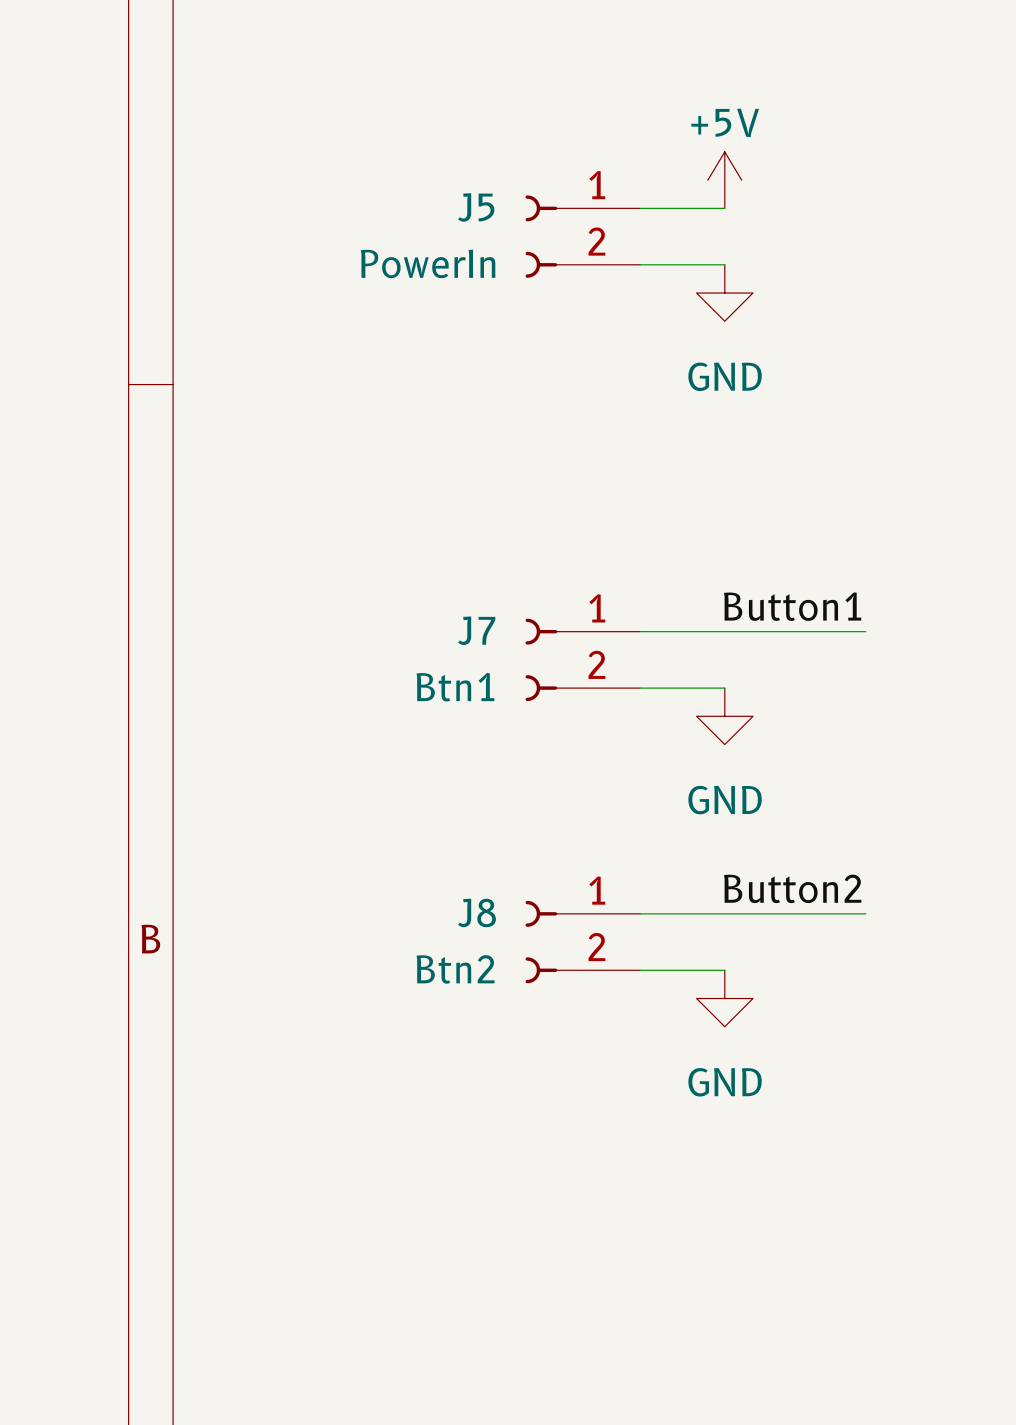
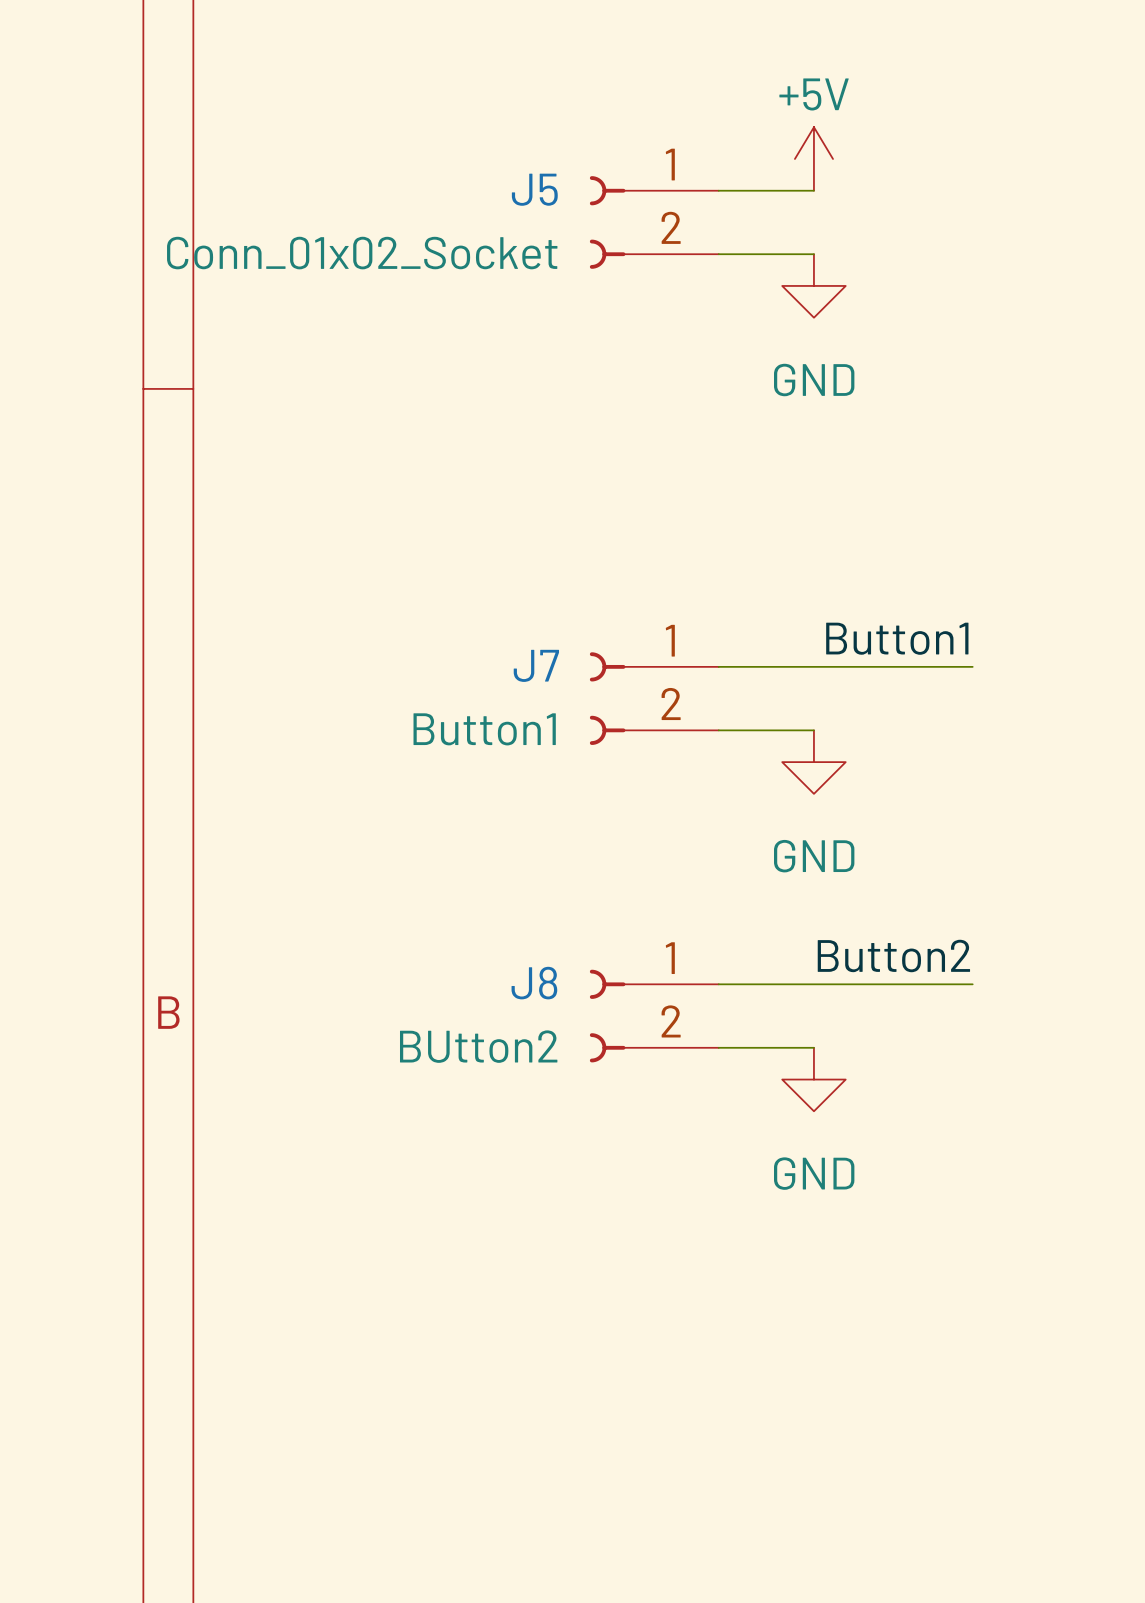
J5 value: PowerIn (428, 263) -> Conn_01x02_Socket (362, 253)
J7 value: Btn1 (455, 687) -> Button1 (484, 729)
J8 value: Btn2 (455, 969) -> BUtton2 (478, 1046)

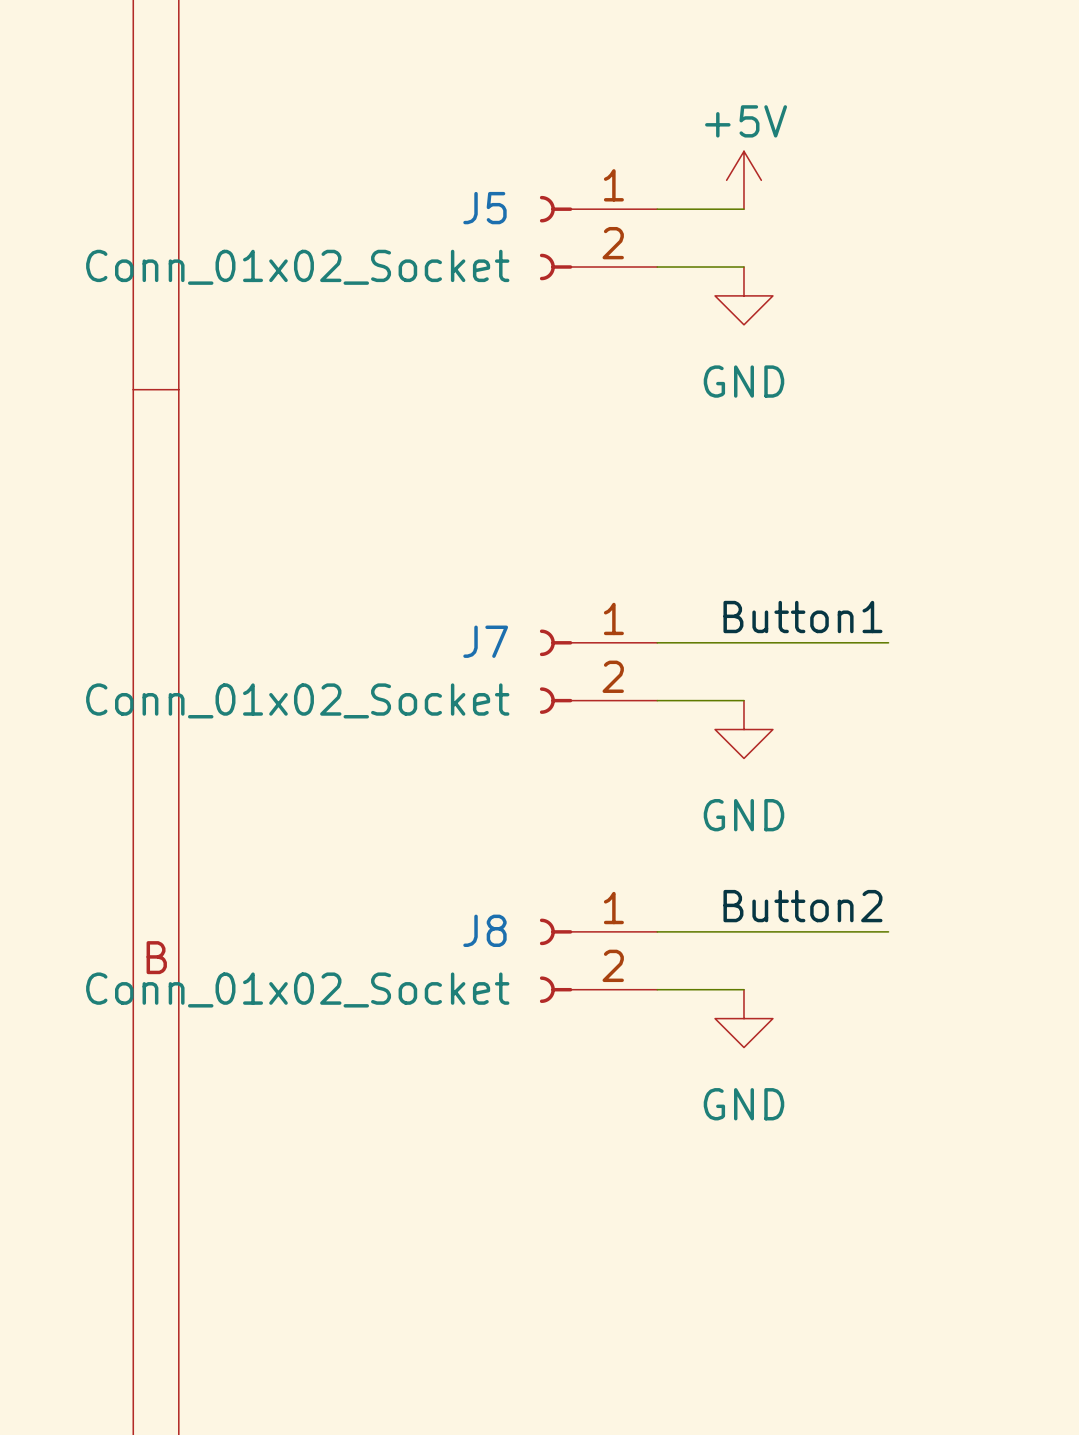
J7 value: Button1 (484, 729) -> Conn_01x02_Socket (297, 700)
J8 value: BUtton2 (478, 1046) -> Conn_01x02_Socket (297, 990)

